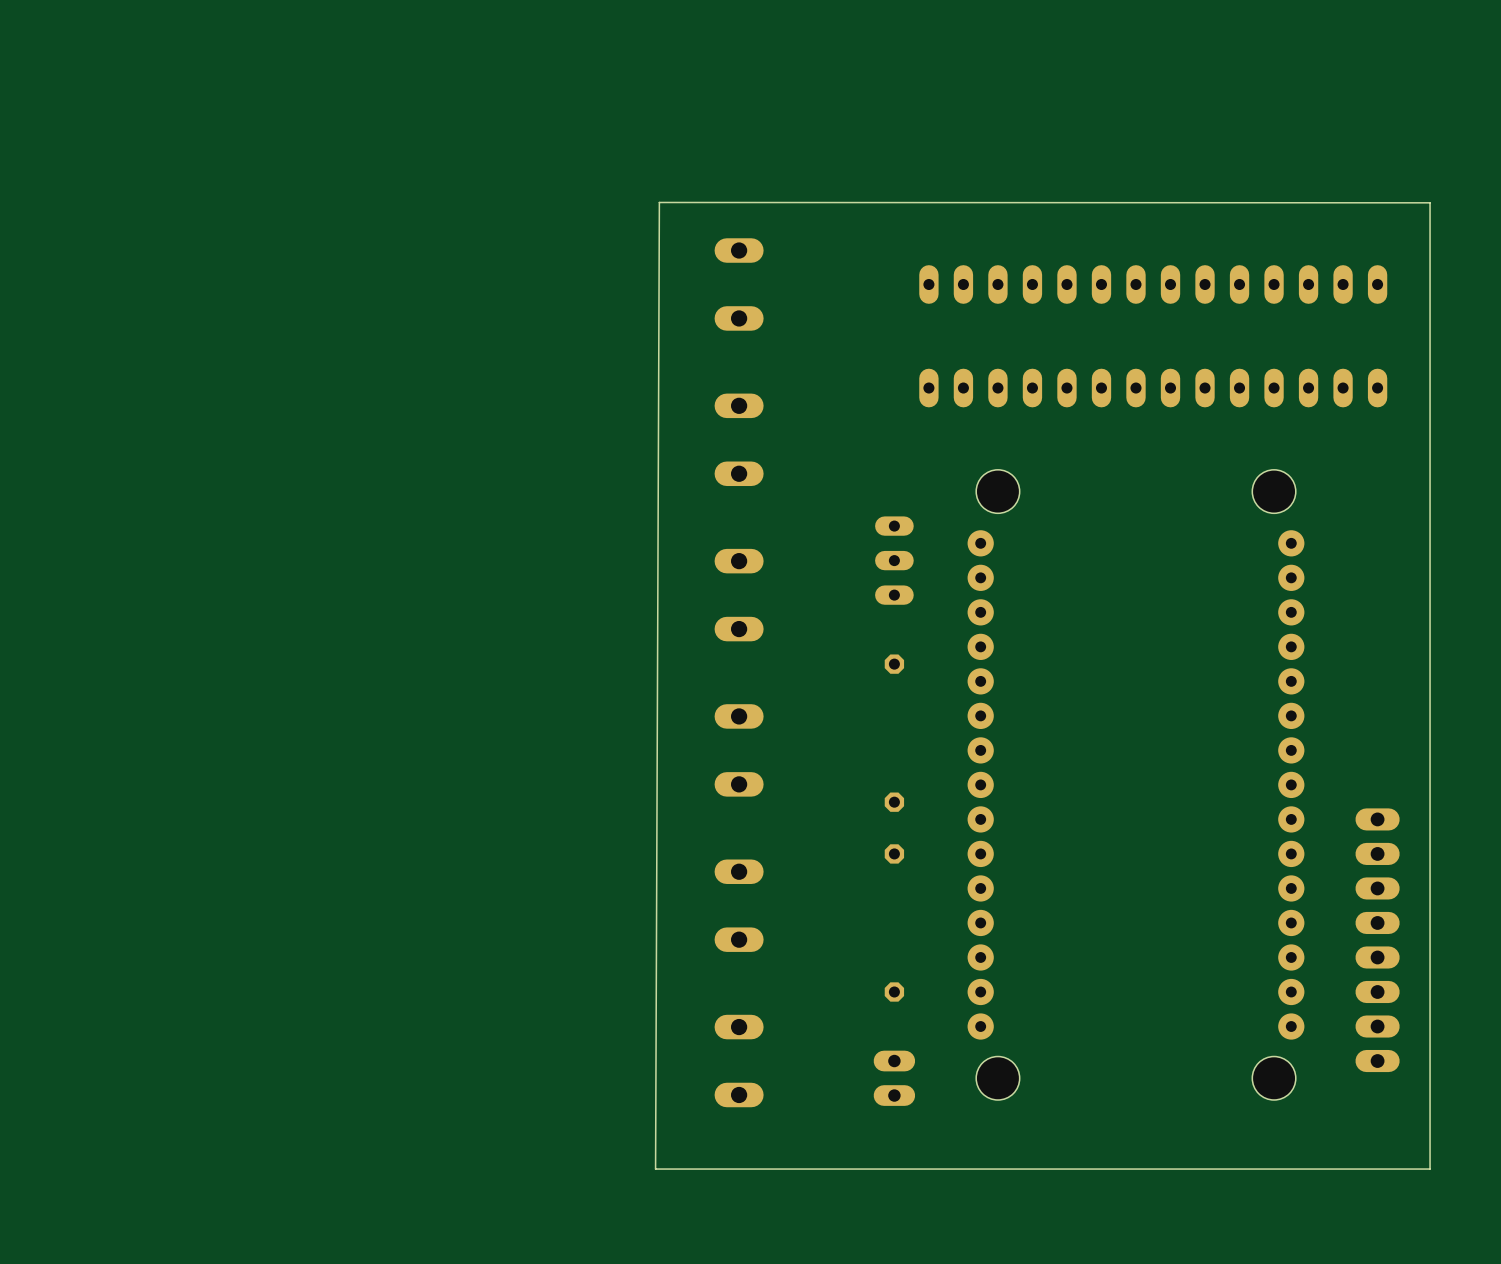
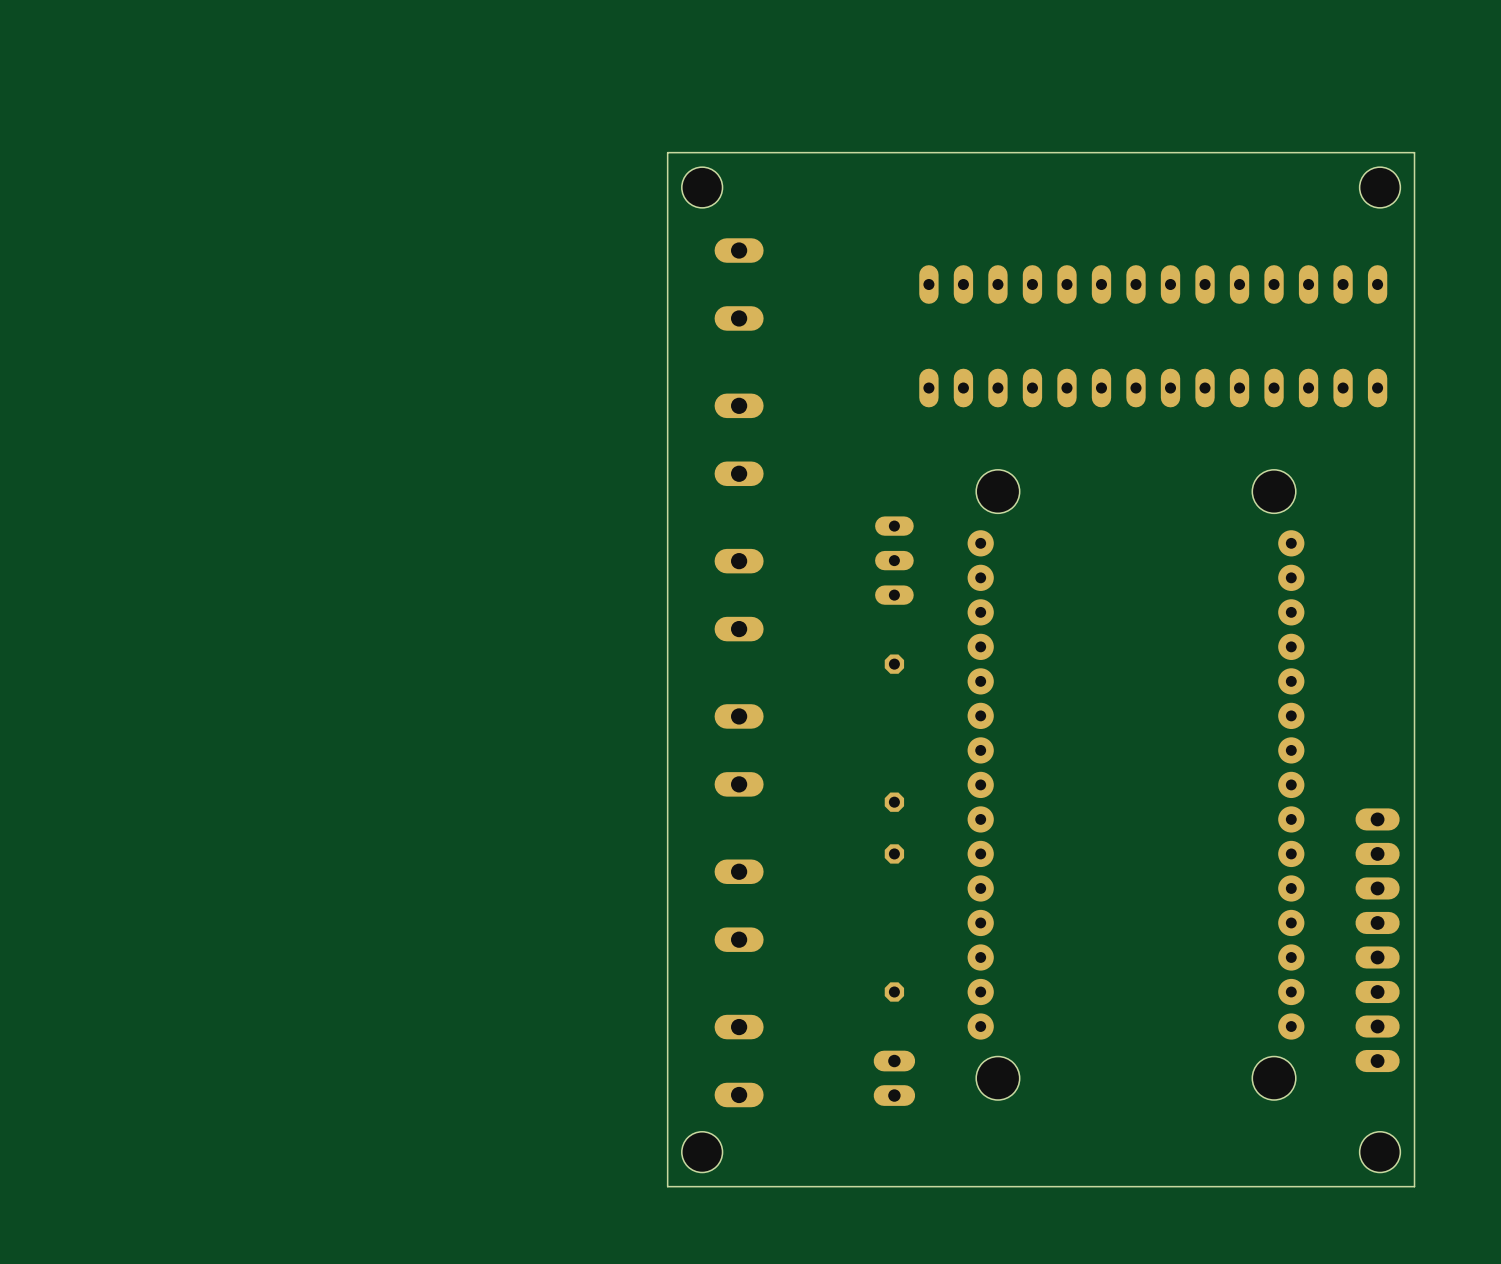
hole: none -> (702, 187)
hole: none -> (1380, 187)
board edge: (659, 202) (655, 1169) (1430, 1169) (1430, 202) (659, 202) -> (1414, 152) (1414, 1186) (667, 1186) (667, 152) (1414, 152)
hole: none -> (702, 1152)
hole: none -> (1380, 1152)

